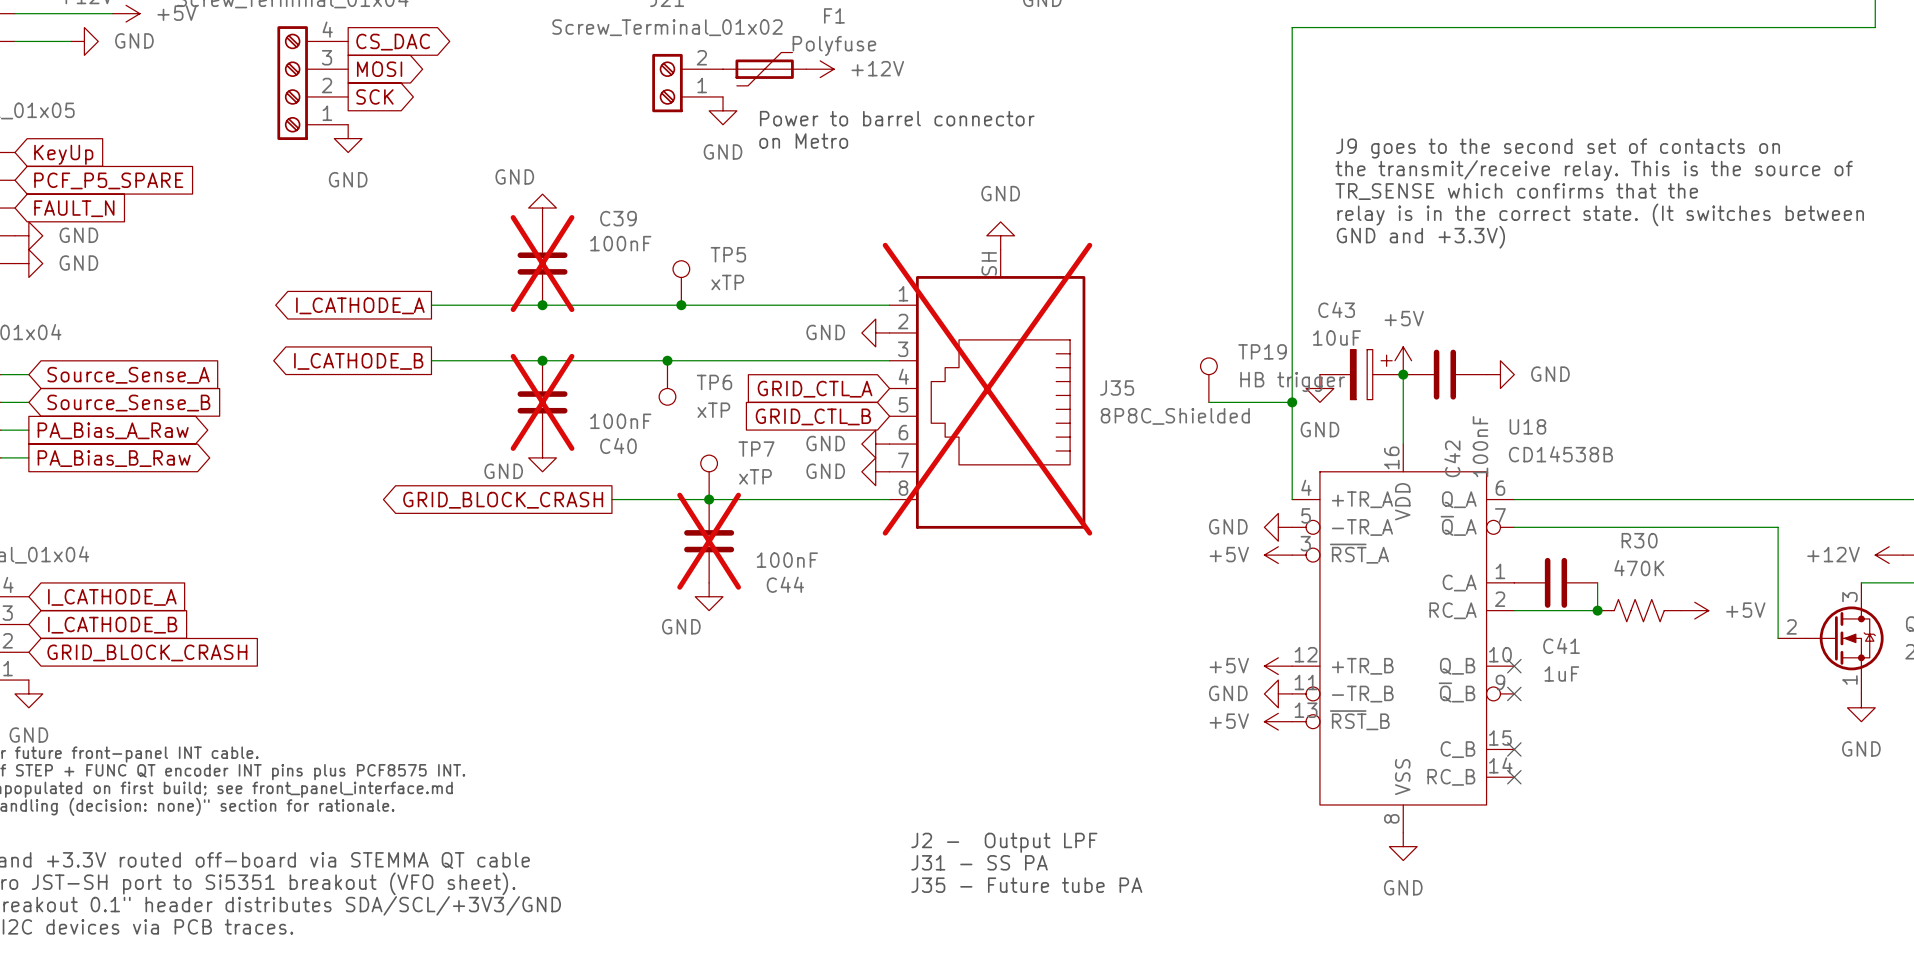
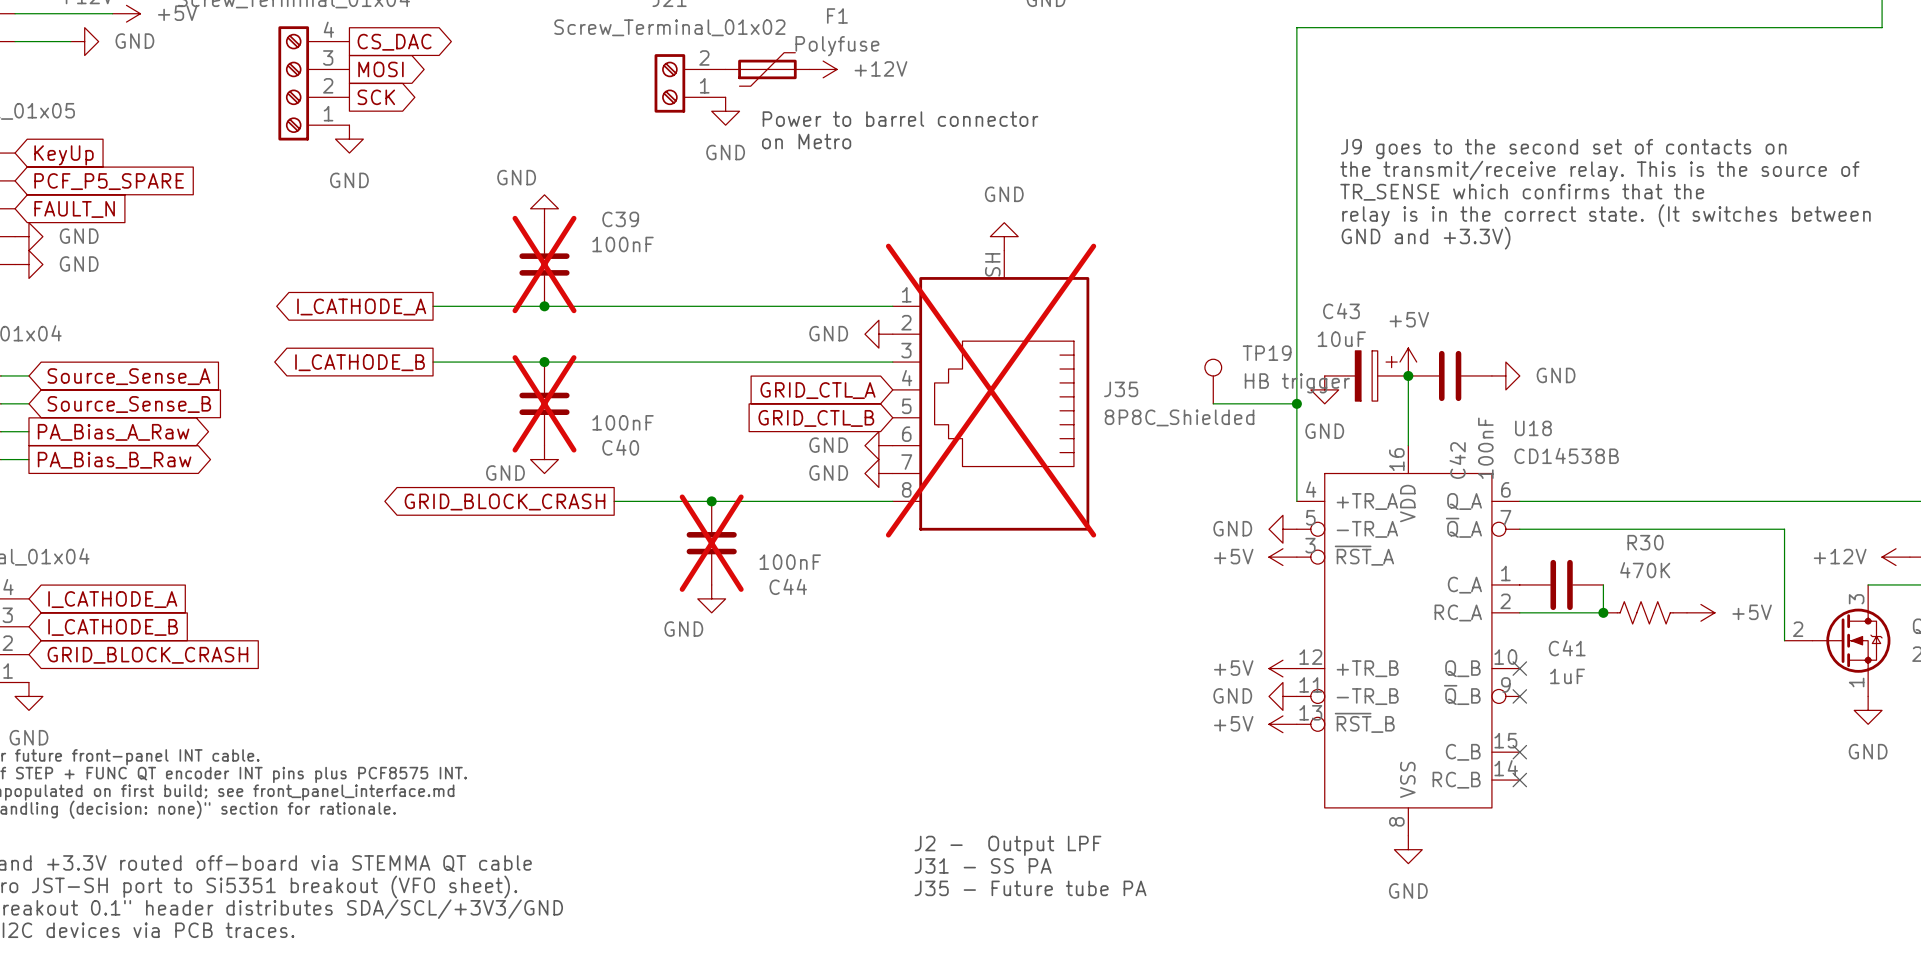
TP5: xTP (681, 282) -> none
junction: (681, 305) -> none
junction: (667, 360) -> none
TP6: xTP (667, 382) -> none
TP7: xTP (709, 477) -> none

